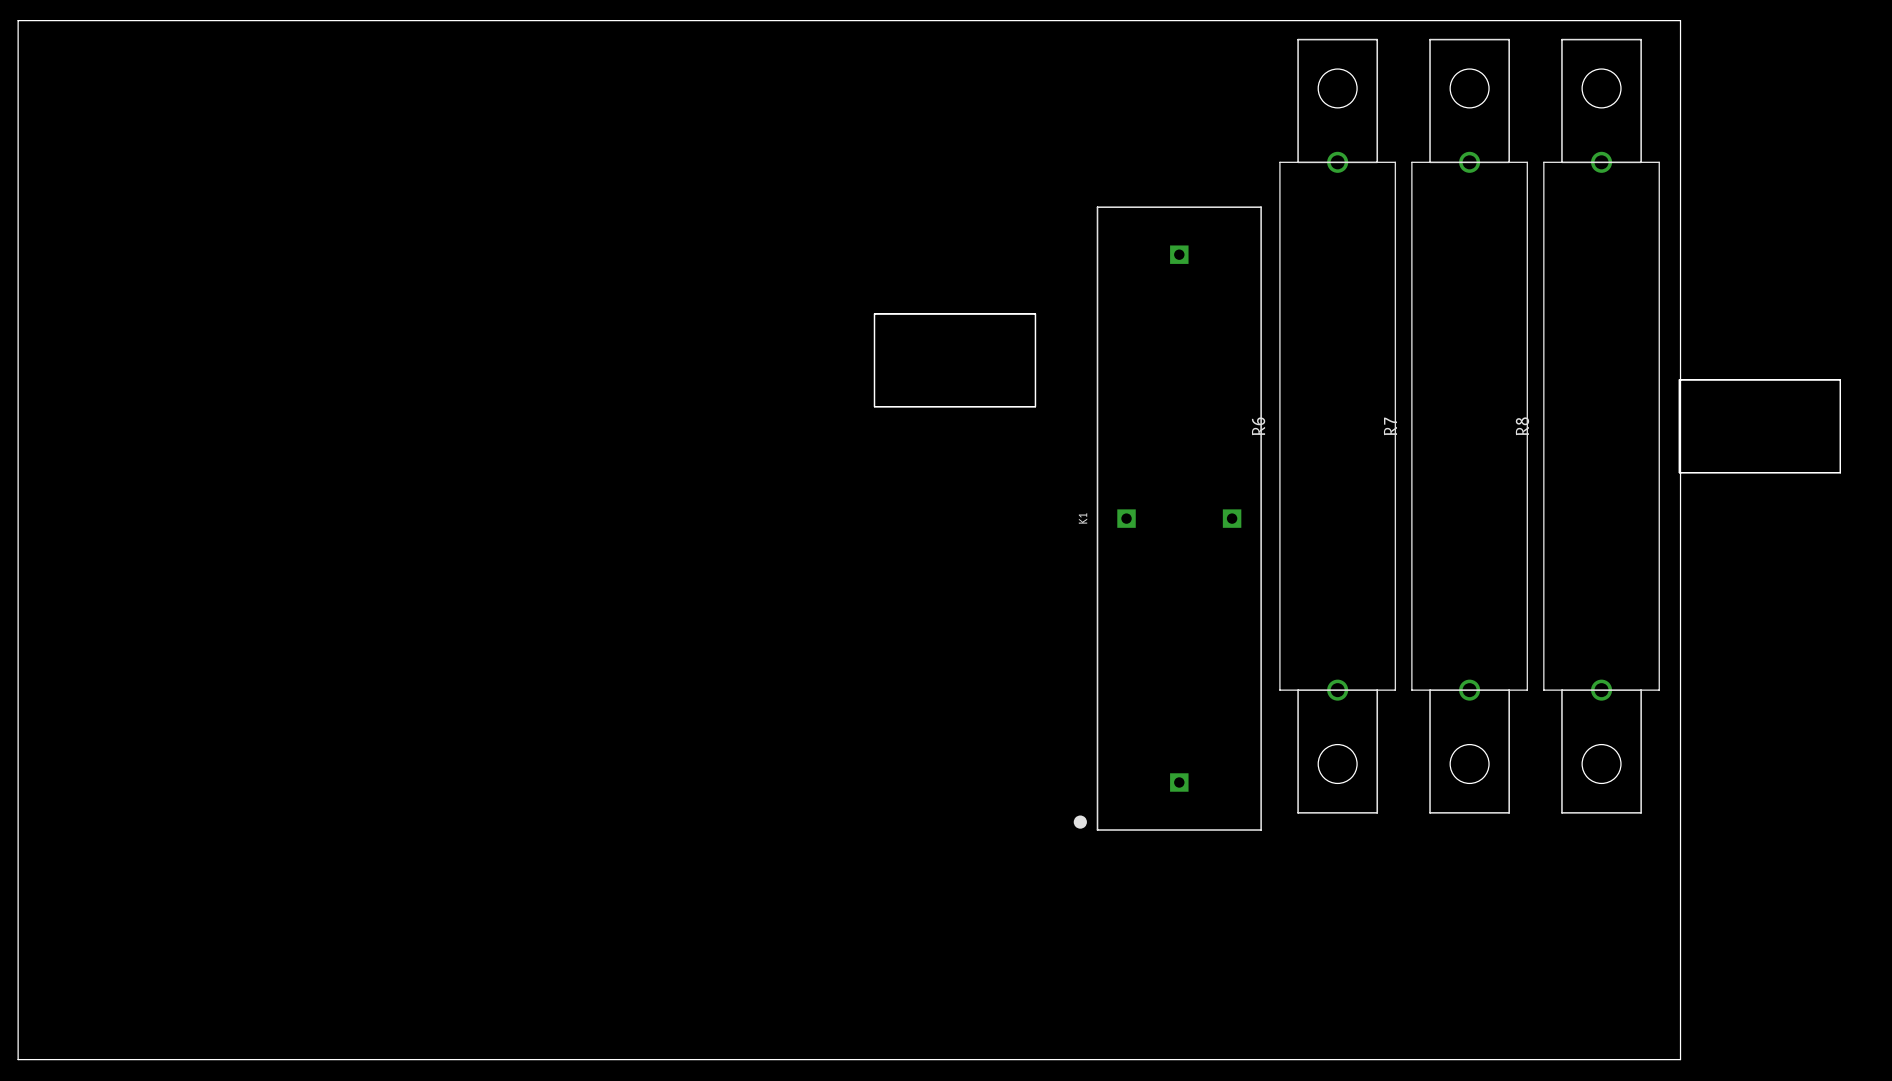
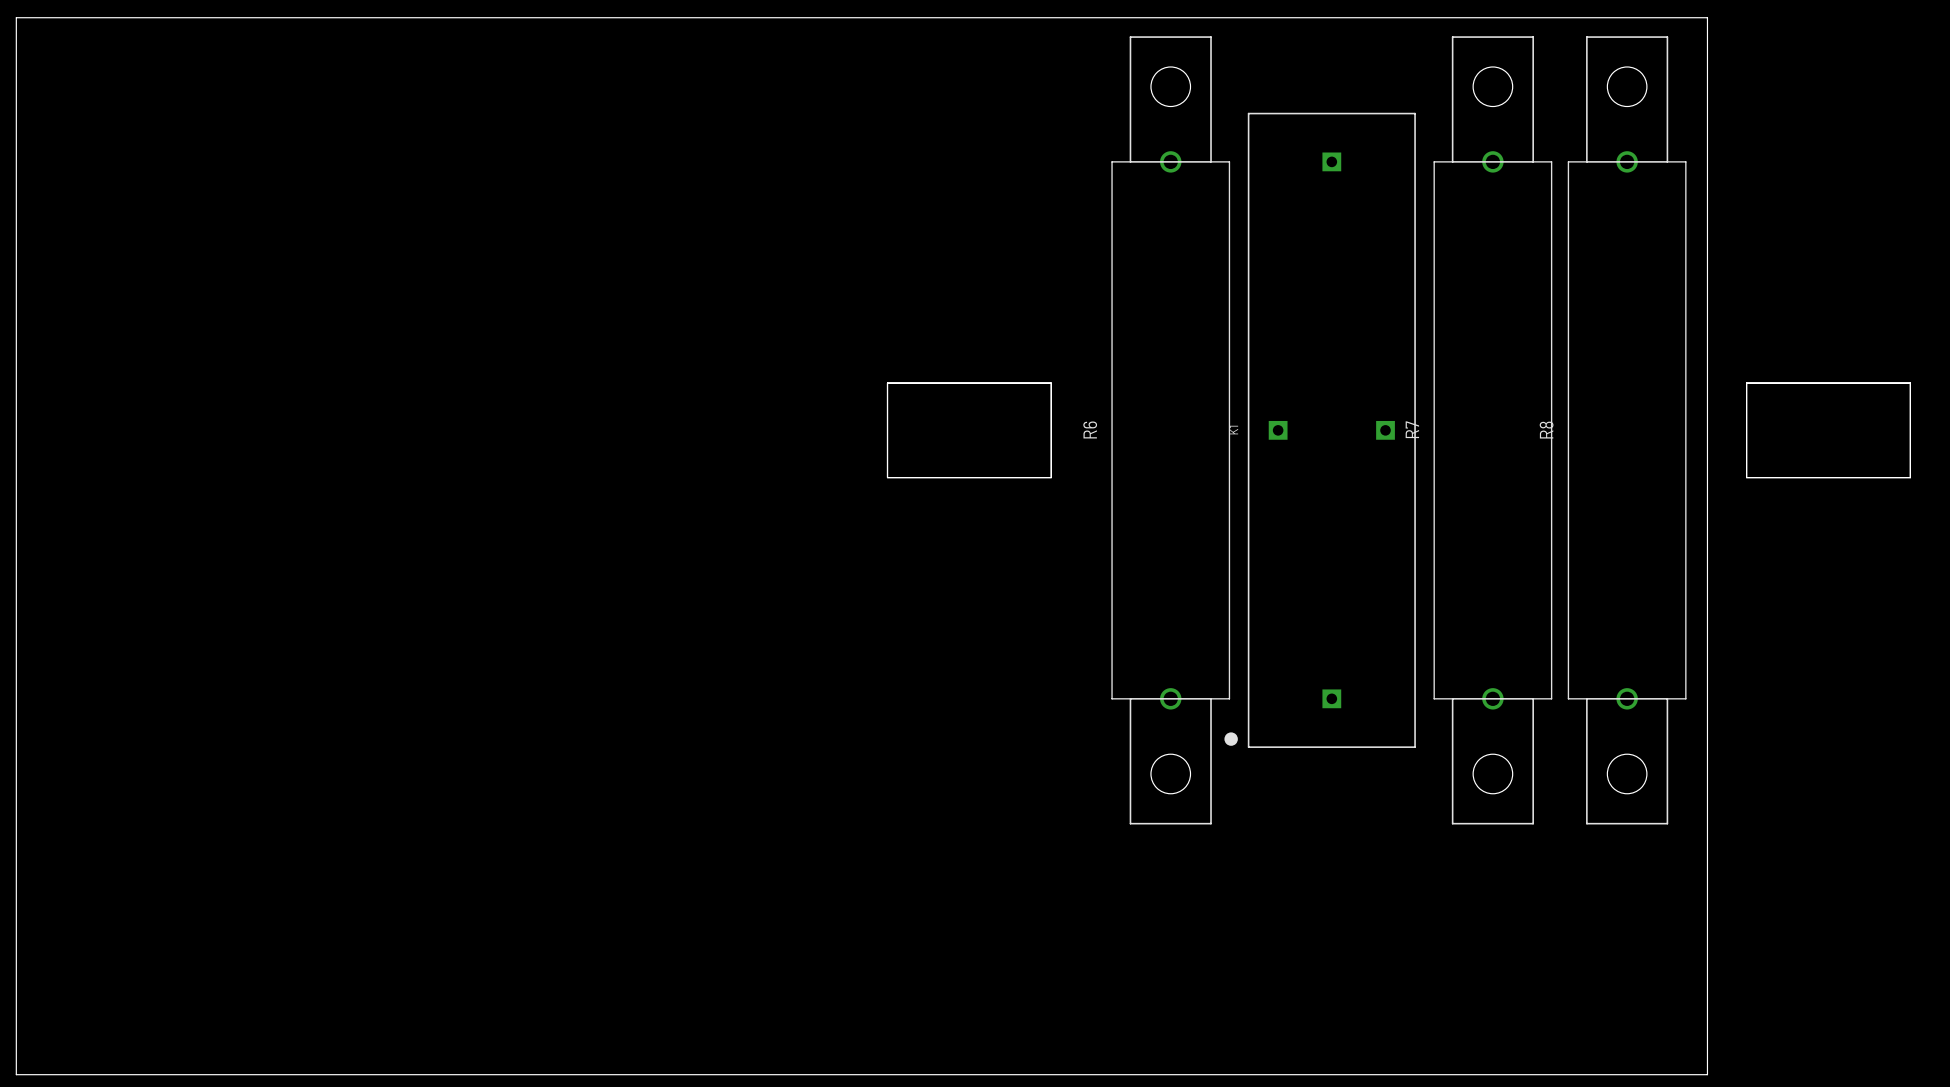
part position: (954, 360) -> (969, 430)
R6 position: (1337, 426) -> (1170, 430)
part position: (1759, 426) -> (1828, 430)
K1 position: (1167, 518) -> (1320, 430)

